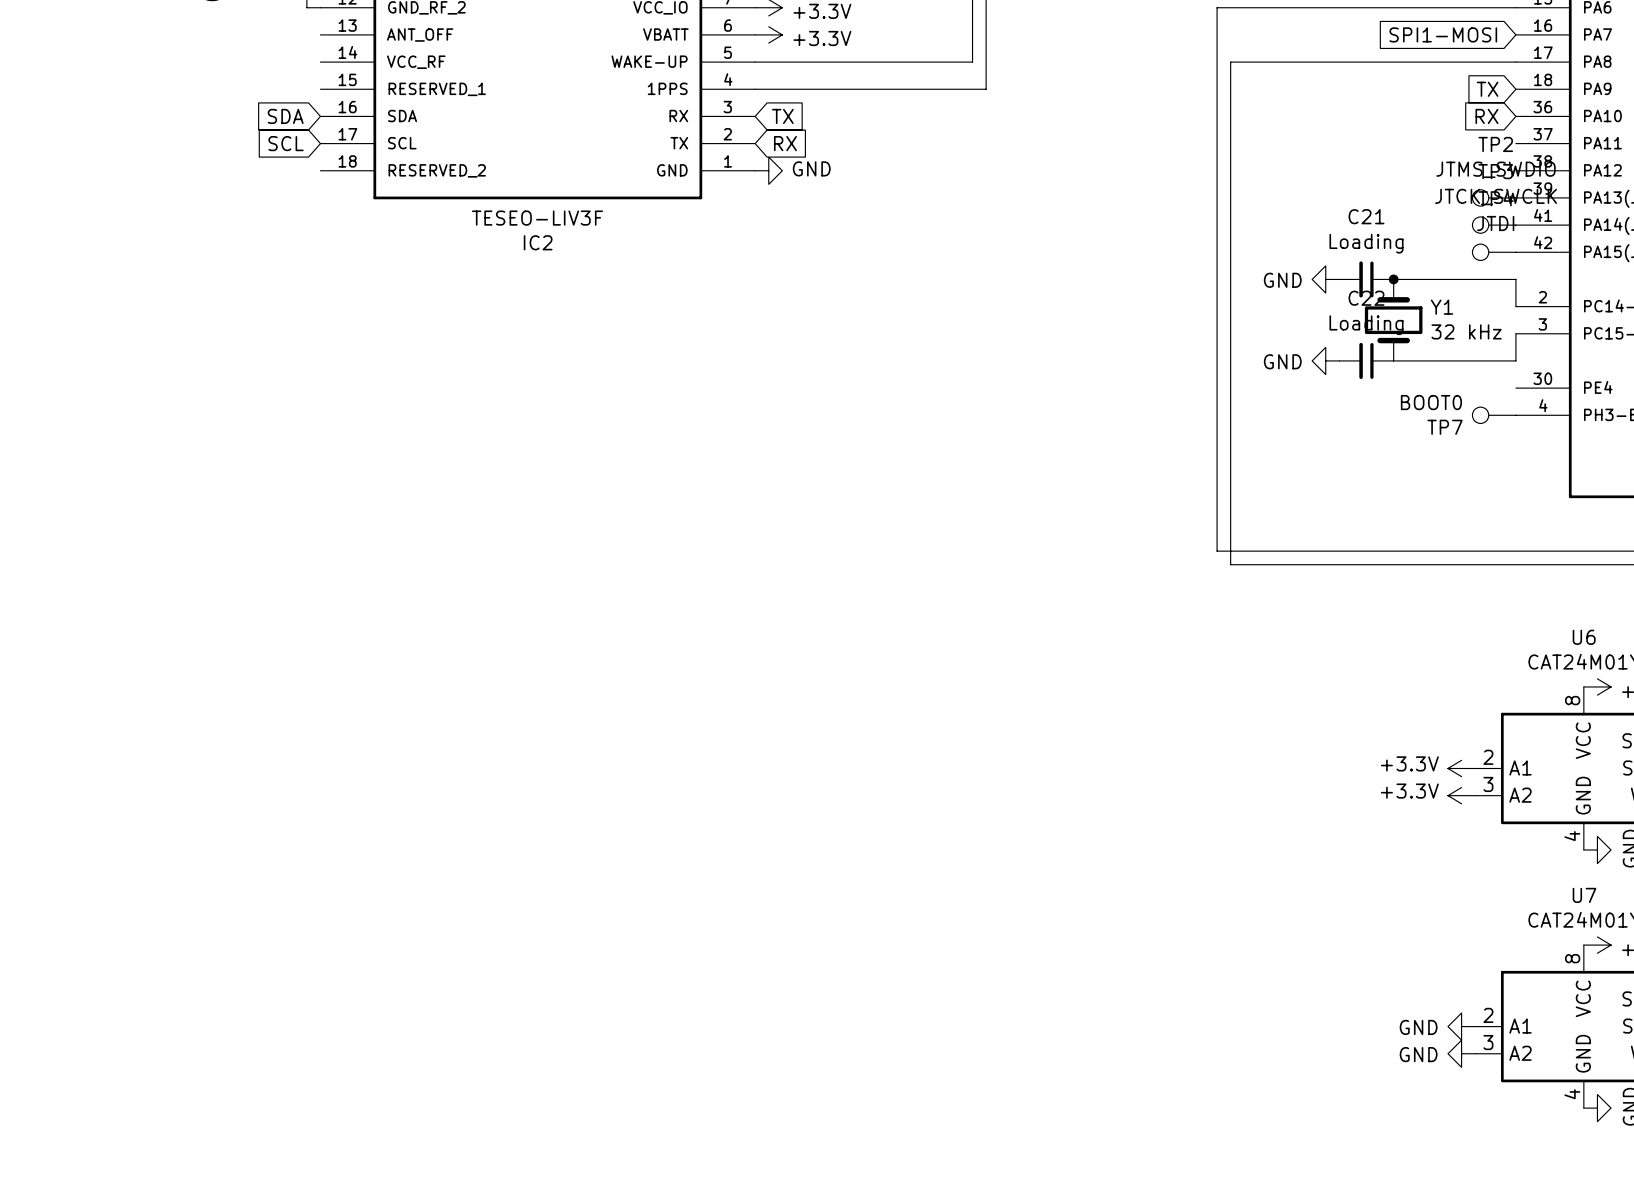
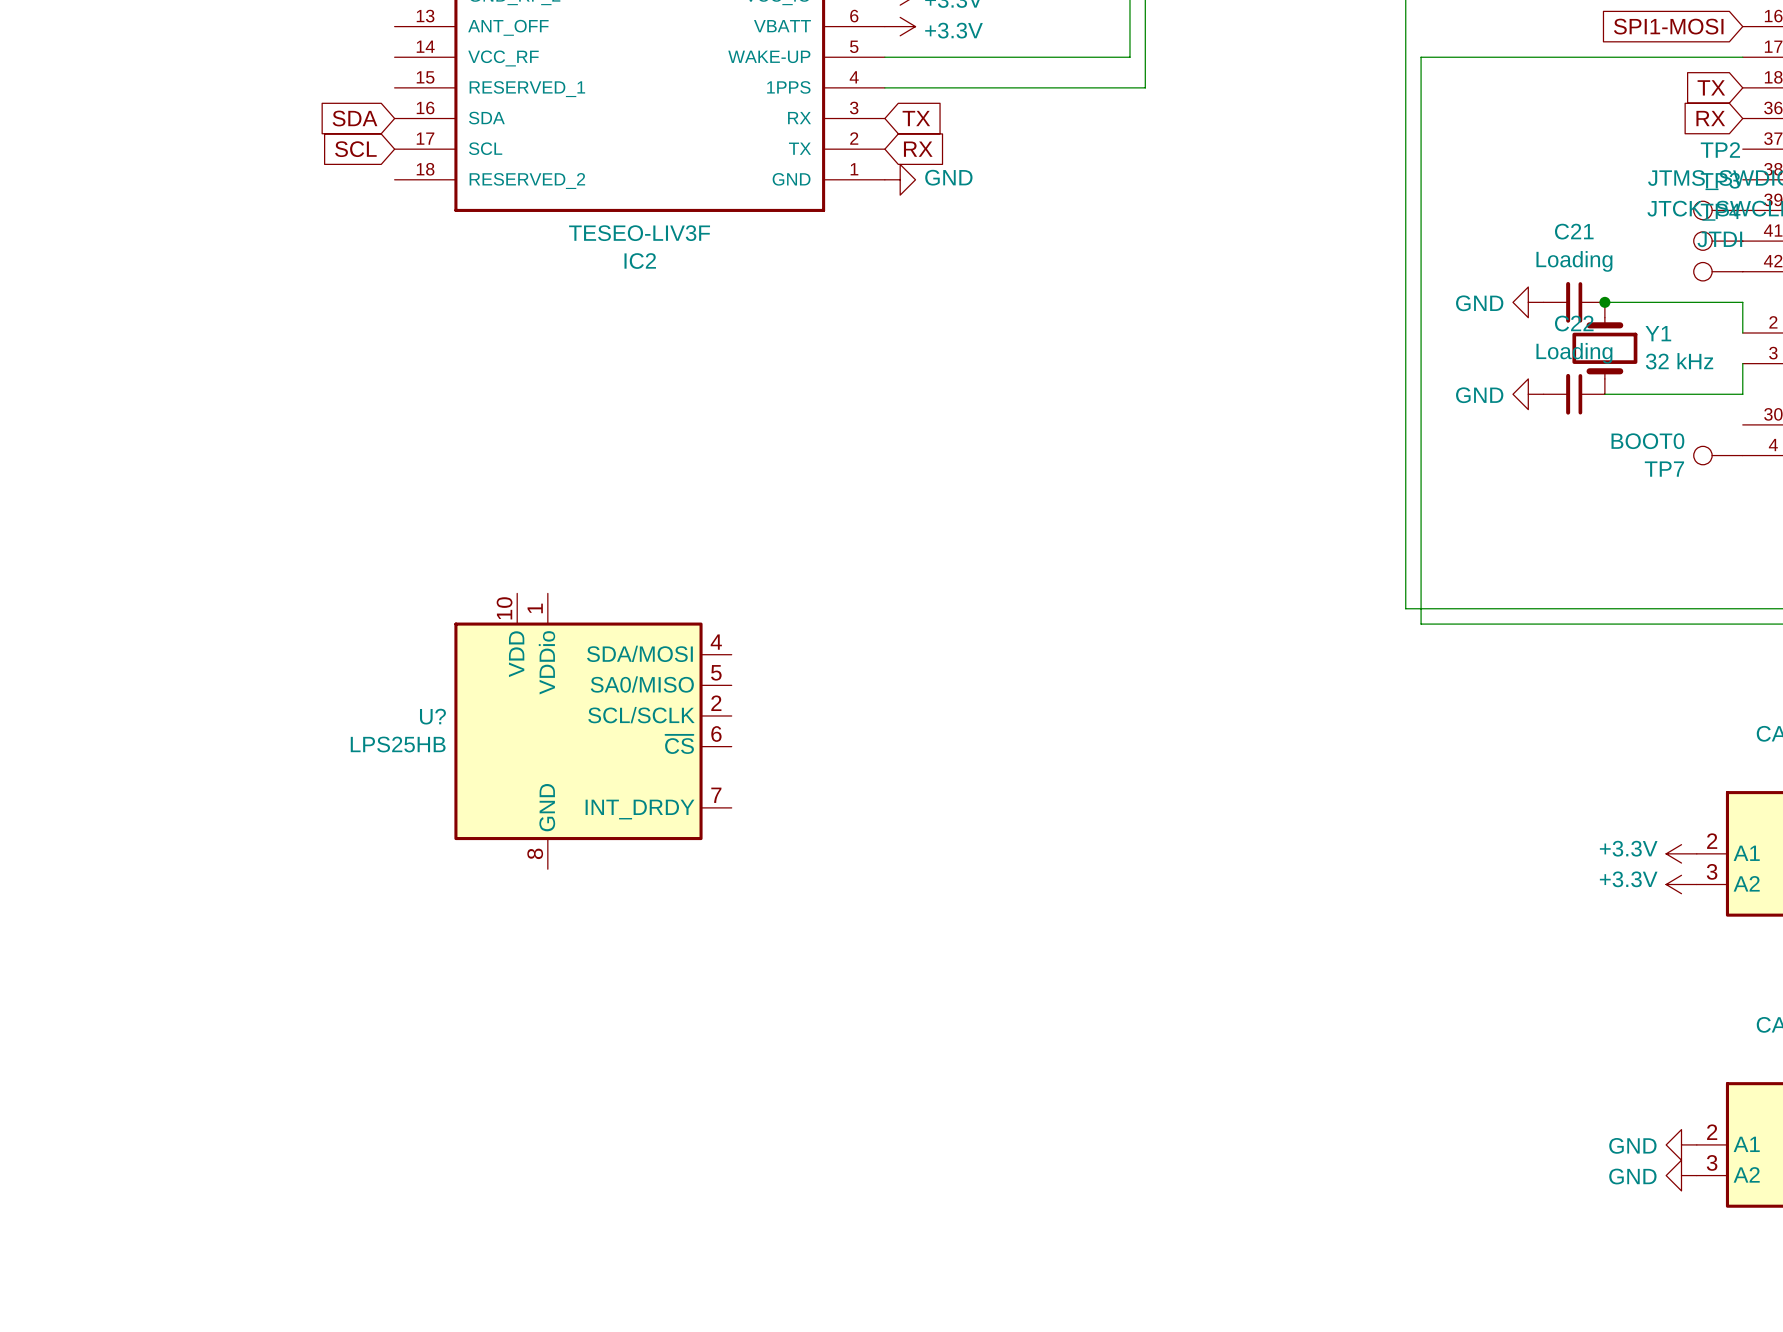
U?: none -> LPS25HB (593, 731)

